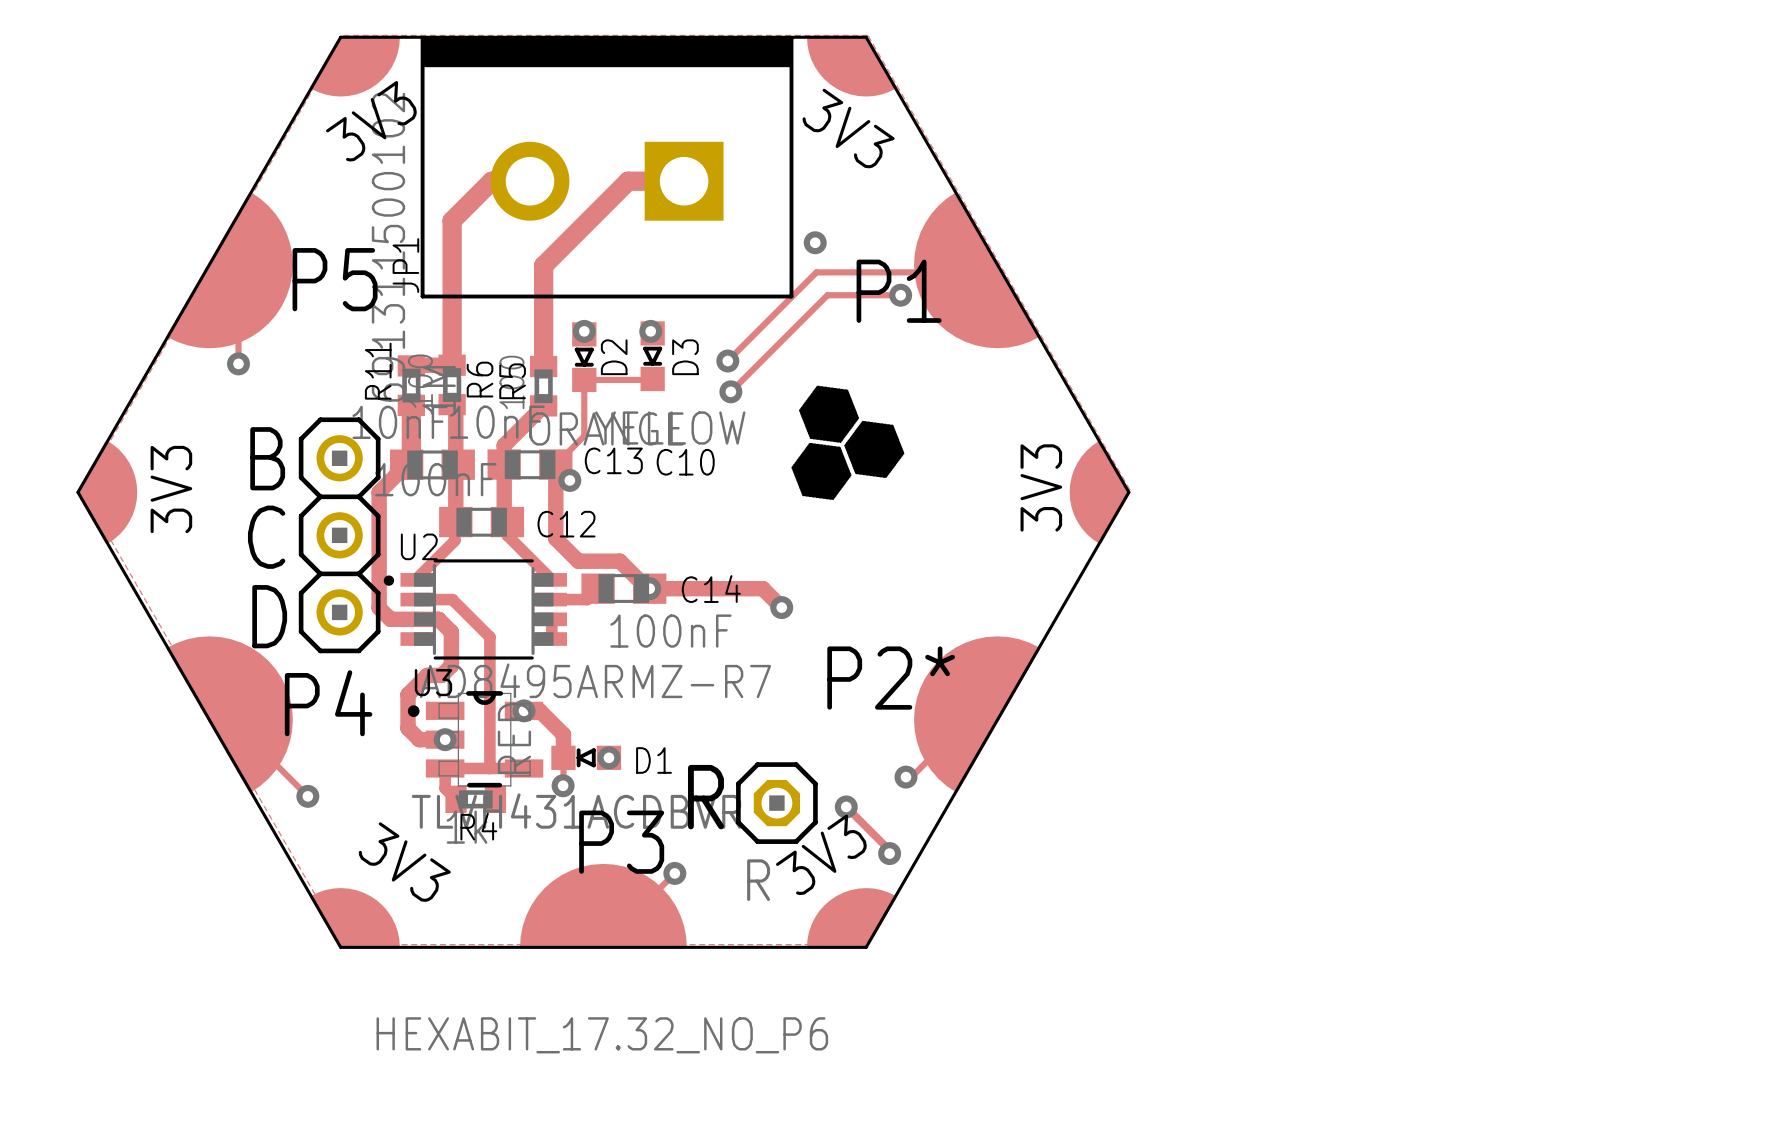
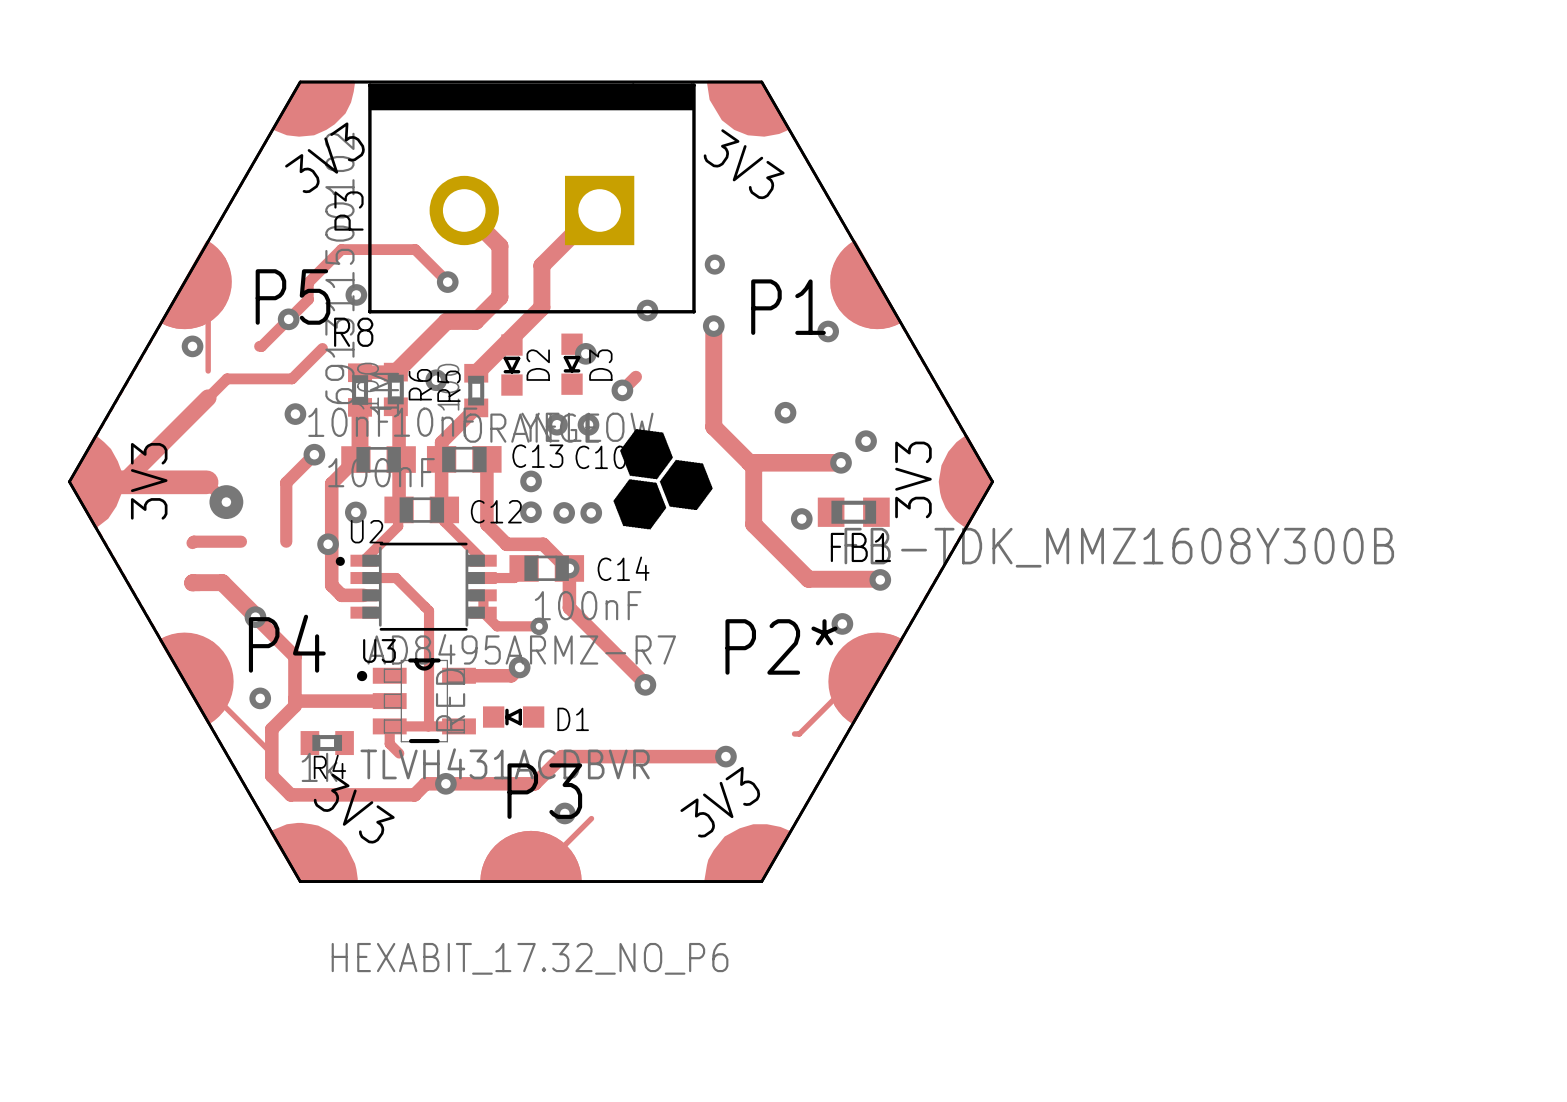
part footprint: [76, 35, 1131, 949] -> [68, 80, 994, 883]
track: (529, 181) (491, 181) (452, 220) (452, 365) -> (464, 210) (499, 246) (499, 297) (475, 321) (446, 321) (395, 372)
track: (681, 181) (628, 181) (543, 265) (543, 366) -> (596, 210) (541, 265) (541, 307) (476, 373)
track: none -> (447, 282) (415, 249) (341, 249) (308, 282) (308, 299) (259, 346)
via: none -> (447, 282)
JP1 name: JP1 (405, 265) -> P3 (348, 211)
track: (976, 272) (816, 272) (727, 361) -> none
via: none -> (356, 294)
via: none -> (647, 310)
track: (900, 295) (827, 295) (730, 391) -> none
via: (900, 295) -> none
via: none -> (288, 319)
track: none -> (713, 326) (713, 426) (749, 462) (841, 462)
via: none -> (713, 326)
via: none -> (828, 331)
via: (584, 331) -> none
via position: (650, 331) -> (585, 353)
via: none -> (192, 346)
track: none -> (322, 348) (292, 378) (227, 378) (208, 397) (123, 482) (110, 482) (206, 482) (226, 502)
via: (727, 361) -> none
via: (238, 363) -> none
track: none -> (635, 376) (622, 390)
R11 name: R11 (378, 371) -> R8 (353, 332)
via: none -> (436, 380)
track: (652, 378) (584, 379) (584, 436) (555, 464) -> none
drawing: [791, 385, 905, 501] -> none
via position: (730, 391) -> (622, 390)
via: none -> (785, 412)
via: none -> (295, 414)
via: none -> (557, 424)
via: none -> (588, 424)
drawing: none -> [613, 429, 713, 530]
via: none -> (866, 441)
text: B (267, 458) -> none
track: none -> (314, 454) (286, 482) (286, 541)
via: none -> (314, 454)
track: none -> (753, 462) (753, 524) (808, 579) (880, 579)
via: none -> (841, 462)
via: (569, 480) -> none
via: none -> (531, 481)
via: none -> (226, 502)
via: none -> (355, 512)
via: none -> (531, 512)
FB1: none -> FB-TDK_MMZ1608Y300B (853, 512)
via: none -> (564, 512)
via: none -> (591, 512)
via: none -> (801, 519)
part: (339, 535) -> none
text: C (266, 537) -> none
track: none -> (240, 541) (192, 543)
via: none -> (328, 544)
track: (649, 588) (762, 588) (781, 607) -> (569, 568) (569, 607) (645, 685)
via: none -> (880, 579)
track: none -> (192, 582) (222, 582) (255, 617)
via: (781, 607) -> none
text: D (269, 616) -> none
track: (415, 619) (438, 619) (451, 632) (451, 665) (441, 675) (427, 675) (408, 694) (408, 728) (419, 739) -> (294, 698) (297, 701) (367, 701)
track: none -> (483, 612) (497, 626) (539, 626)
track: none -> (255, 617) (294, 656) (294, 706) (271, 729) (271, 775) (290, 794) (414, 794) (425, 783) (534, 783) (562, 756) (725, 756)
via: none -> (255, 617)
via: none -> (842, 623)
via: none -> (539, 626)
via: none -> (519, 667)
text position: P4 (328, 703) -> P4 (287, 643)
via: (524, 710) -> none
track: (539, 710) (563, 734) (563, 785) -> (472, 675) (511, 675) (520, 666)
via: none -> (645, 684)
via: none -> (260, 698)
via: (445, 739) -> none
via: (608, 757) -> none
via: (905, 777) -> none
via: (563, 785) -> none
via: (307, 796) -> none
R4 position: (475, 799) -> (327, 743)
R: R (776, 803) -> none
track: (846, 806) (889, 850) (889, 853) -> none
via position: (846, 806) -> (725, 756)
via: none -> (445, 783)
via: (889, 853) -> none
via: none -> (564, 813)
via: (674, 873) -> none

